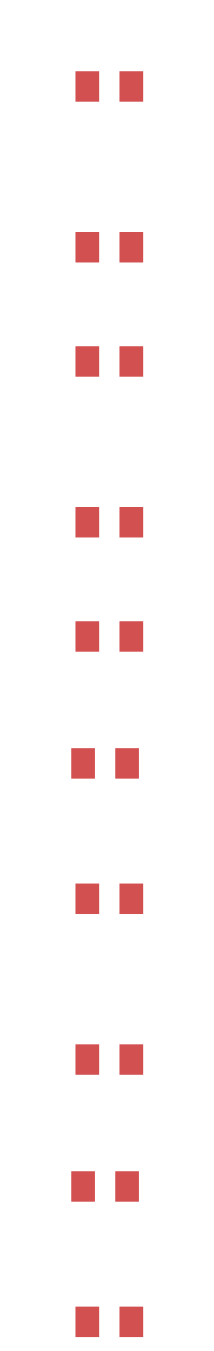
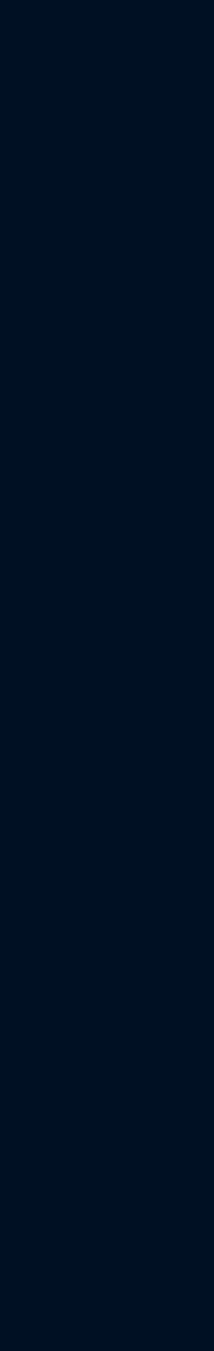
part: (109, 86) -> none
part: (109, 247) -> none
part: (109, 361) -> none
part: (109, 522) -> none
part: (109, 636) -> none
part: (105, 763) -> none
part: (109, 898) -> none
part: (109, 1059) -> none
part: (105, 1186) -> none
part: (109, 1321) -> none

